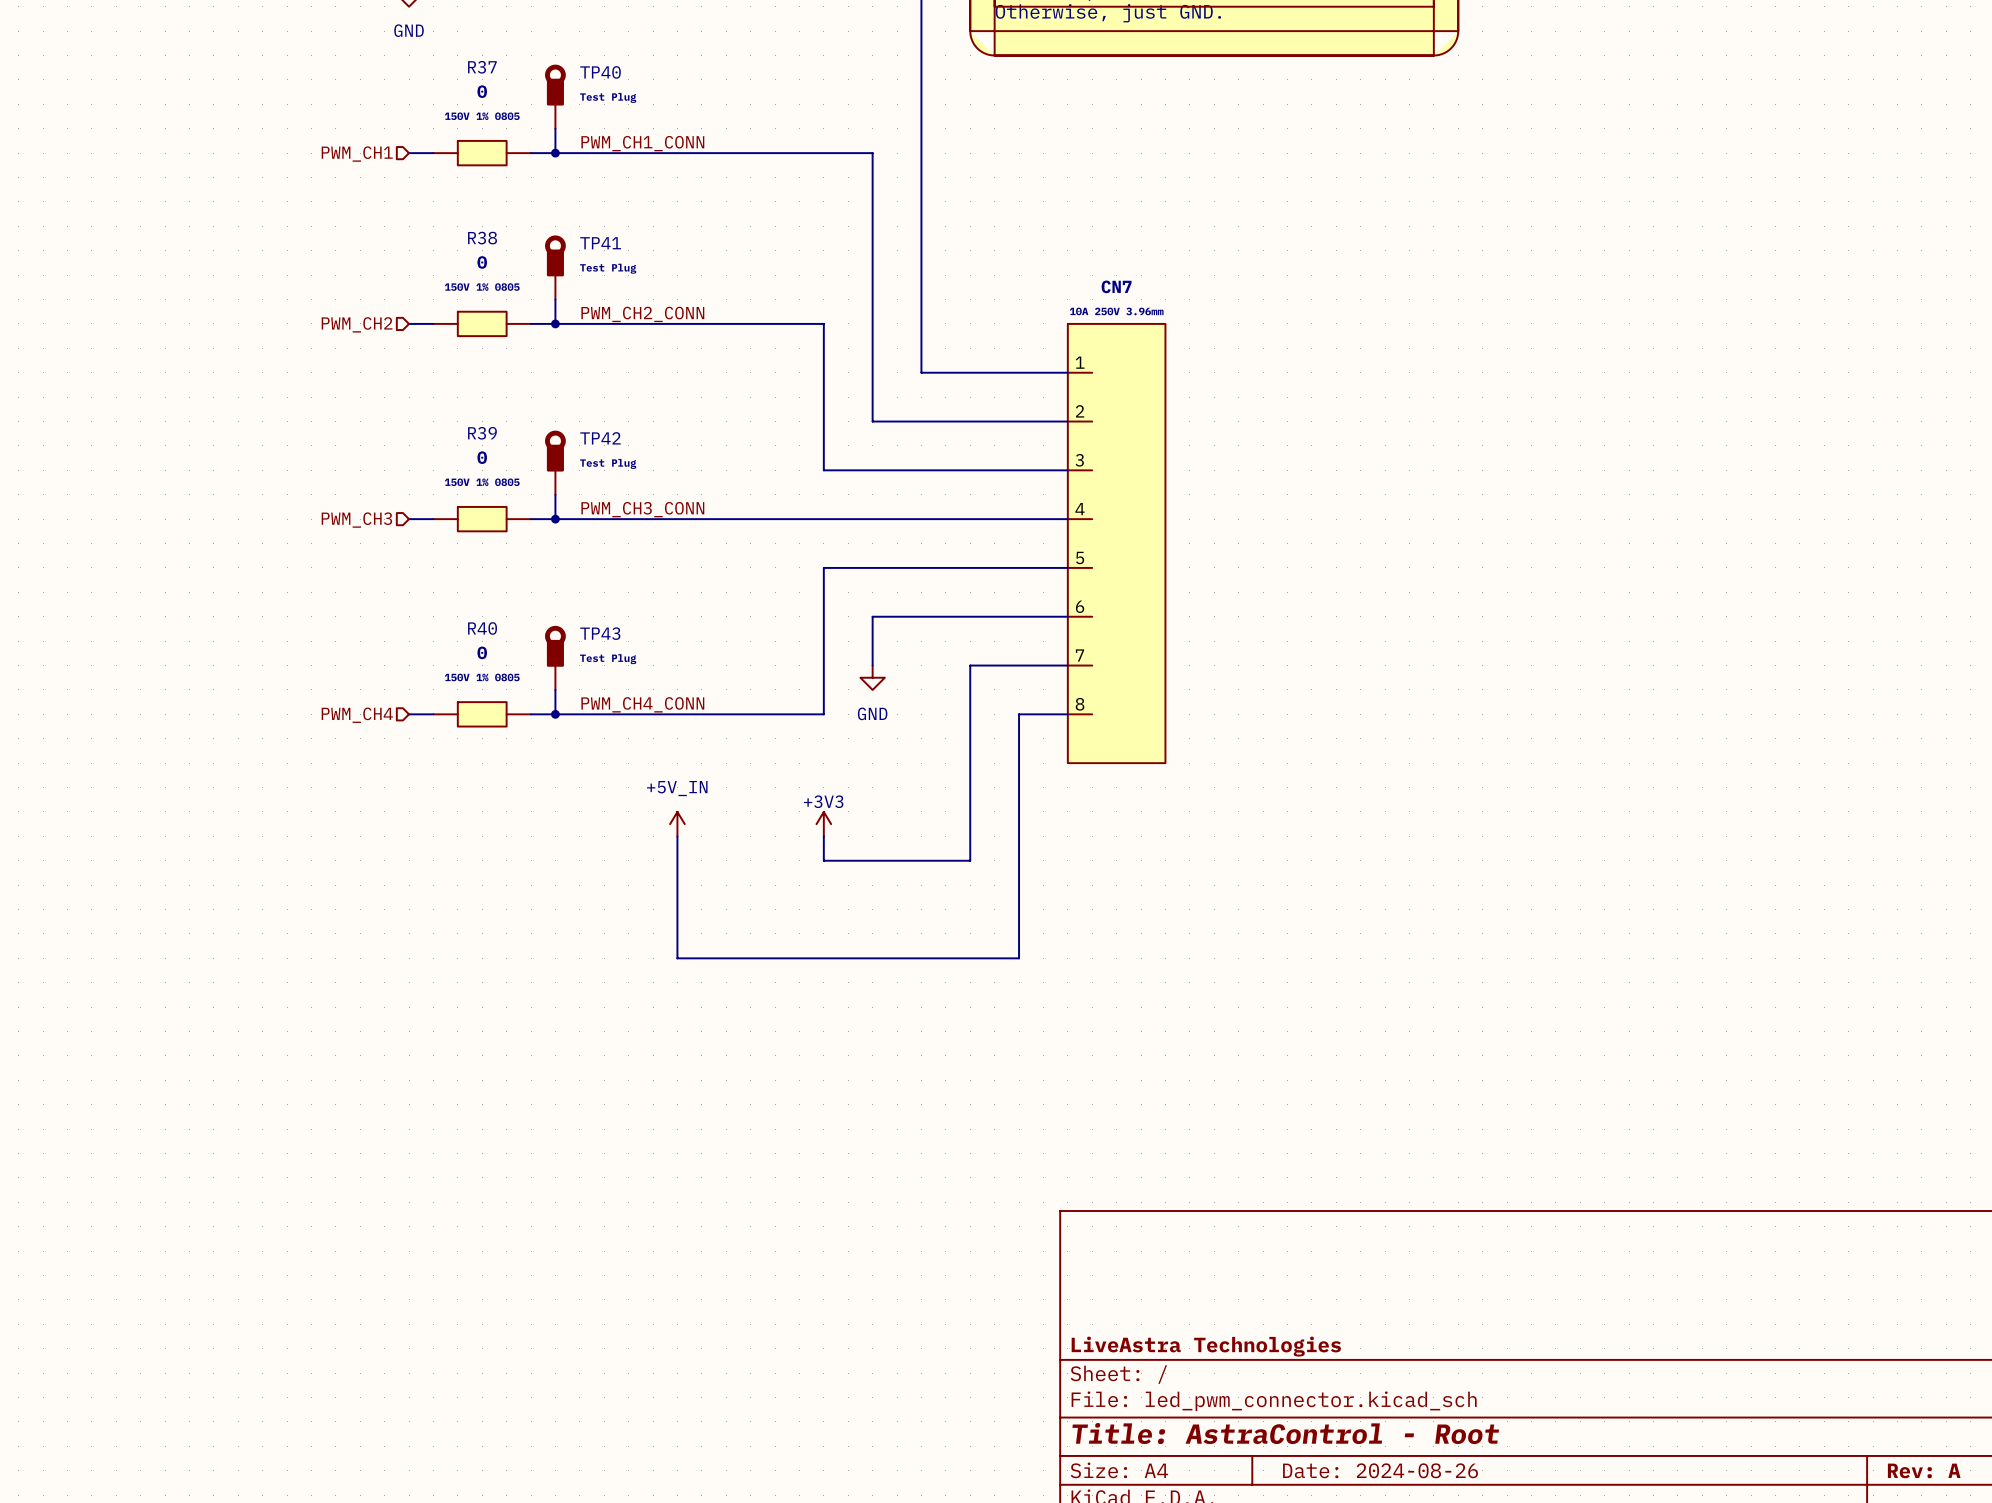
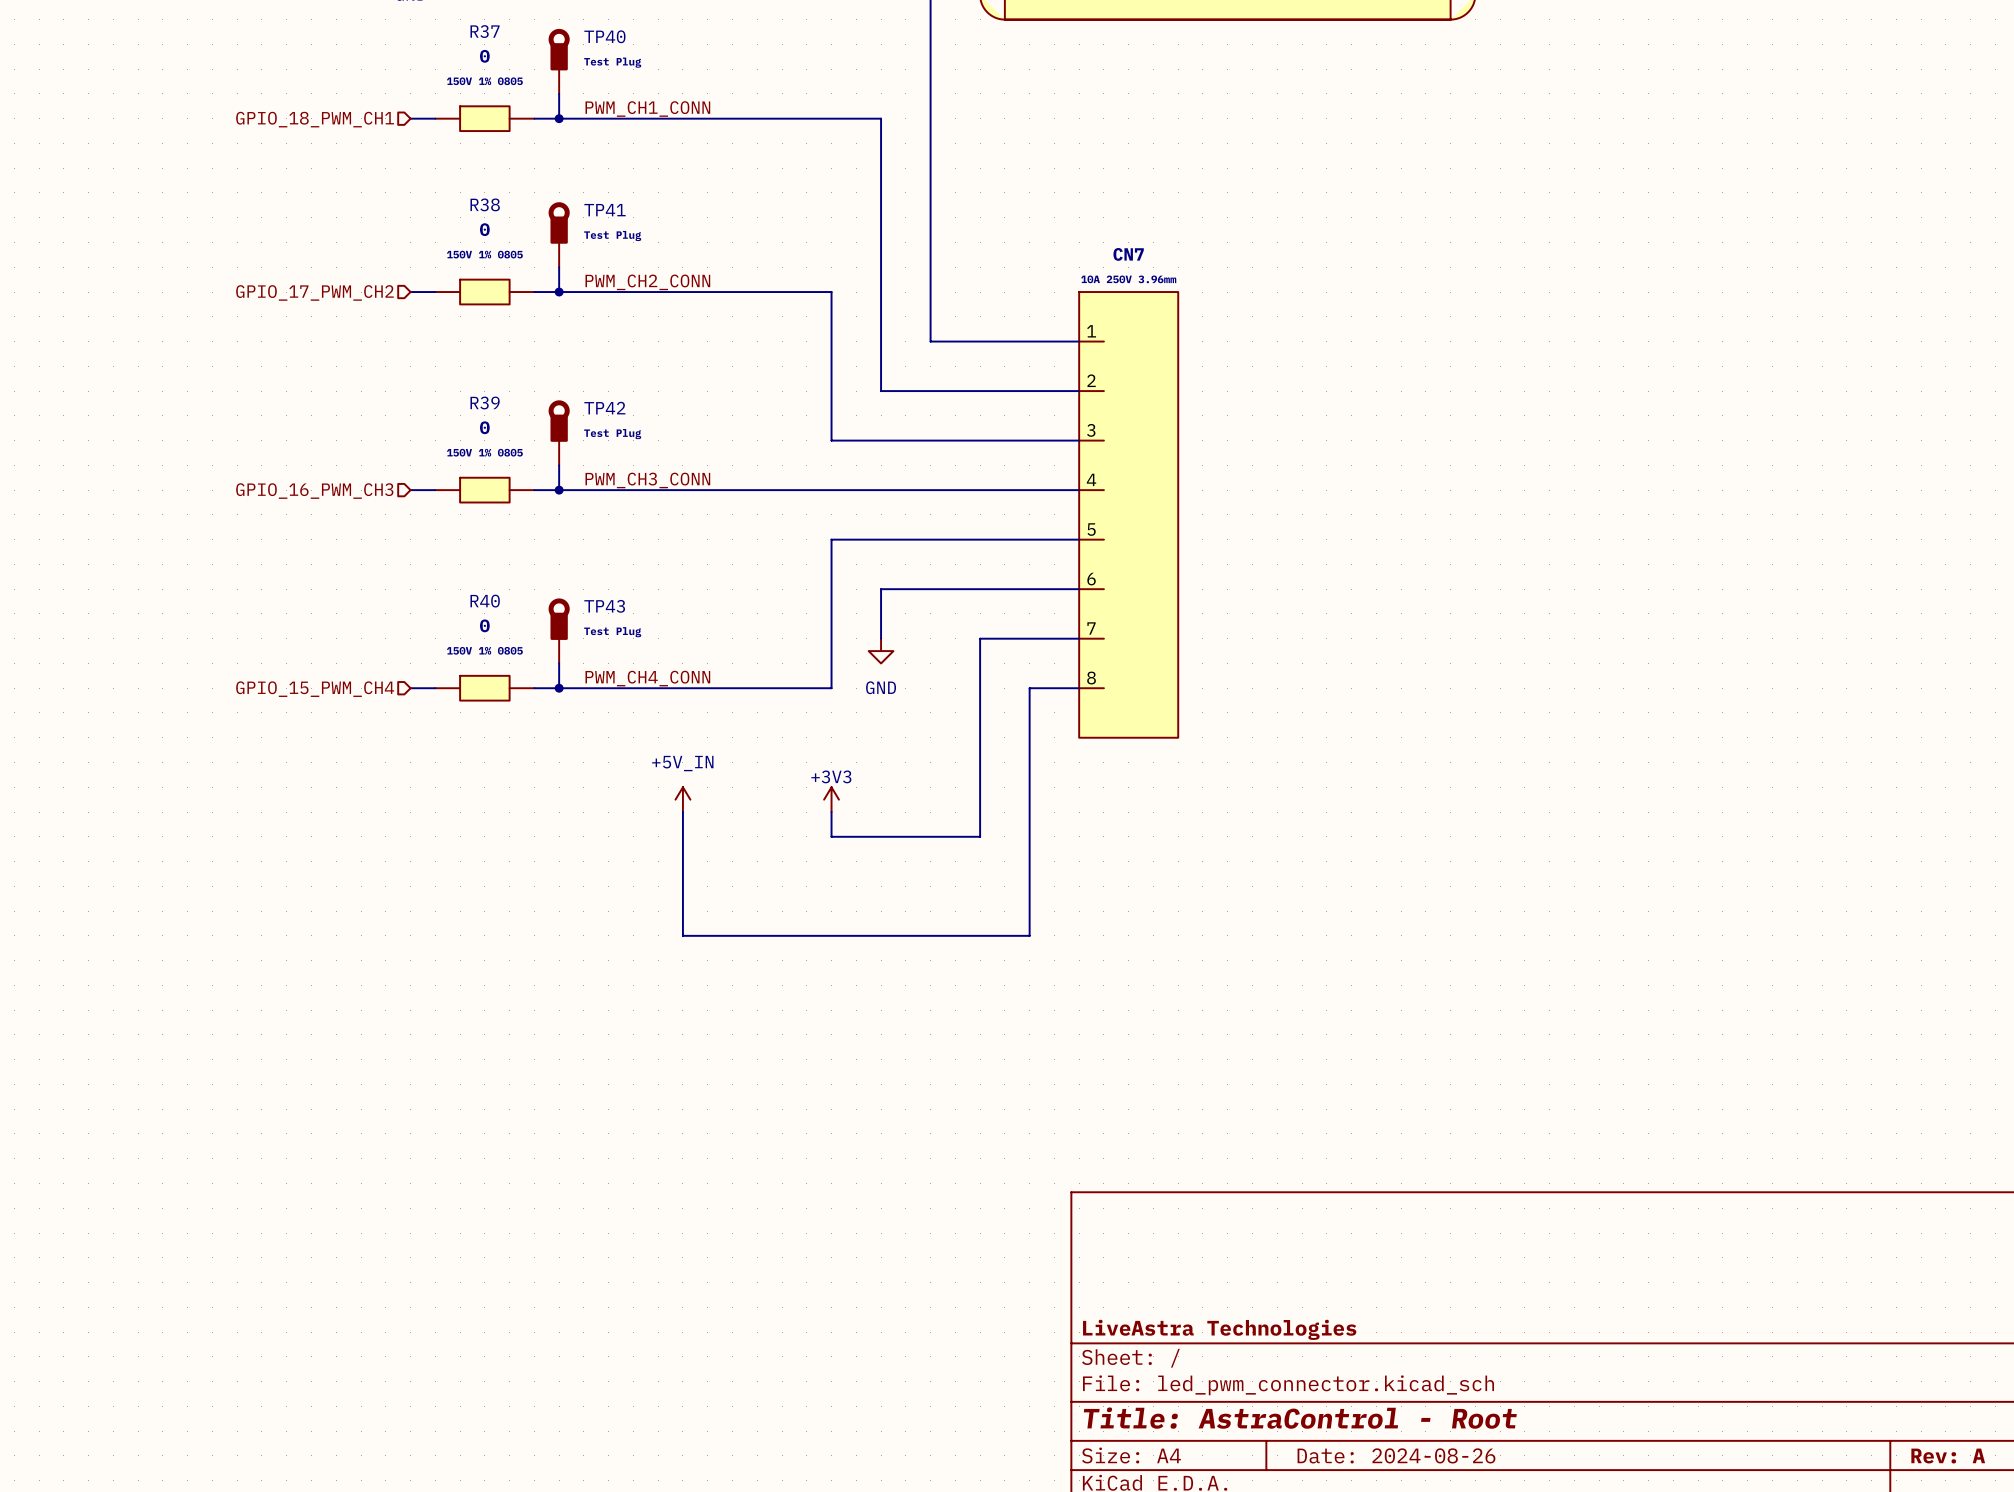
hierarchical label: PWM_CH1 (357, 154) -> GPIO_18_PWM_CH1 (315, 119)
hierarchical label: PWM_CH2 (357, 324) -> GPIO_17_PWM_CH2 (314, 292)
hierarchical label: PWM_CH3 (356, 520) -> GPIO_16_PWM_CH3 (314, 491)
hierarchical label: PWM_CH4 (357, 715) -> GPIO_15_PWM_CH4 (315, 689)

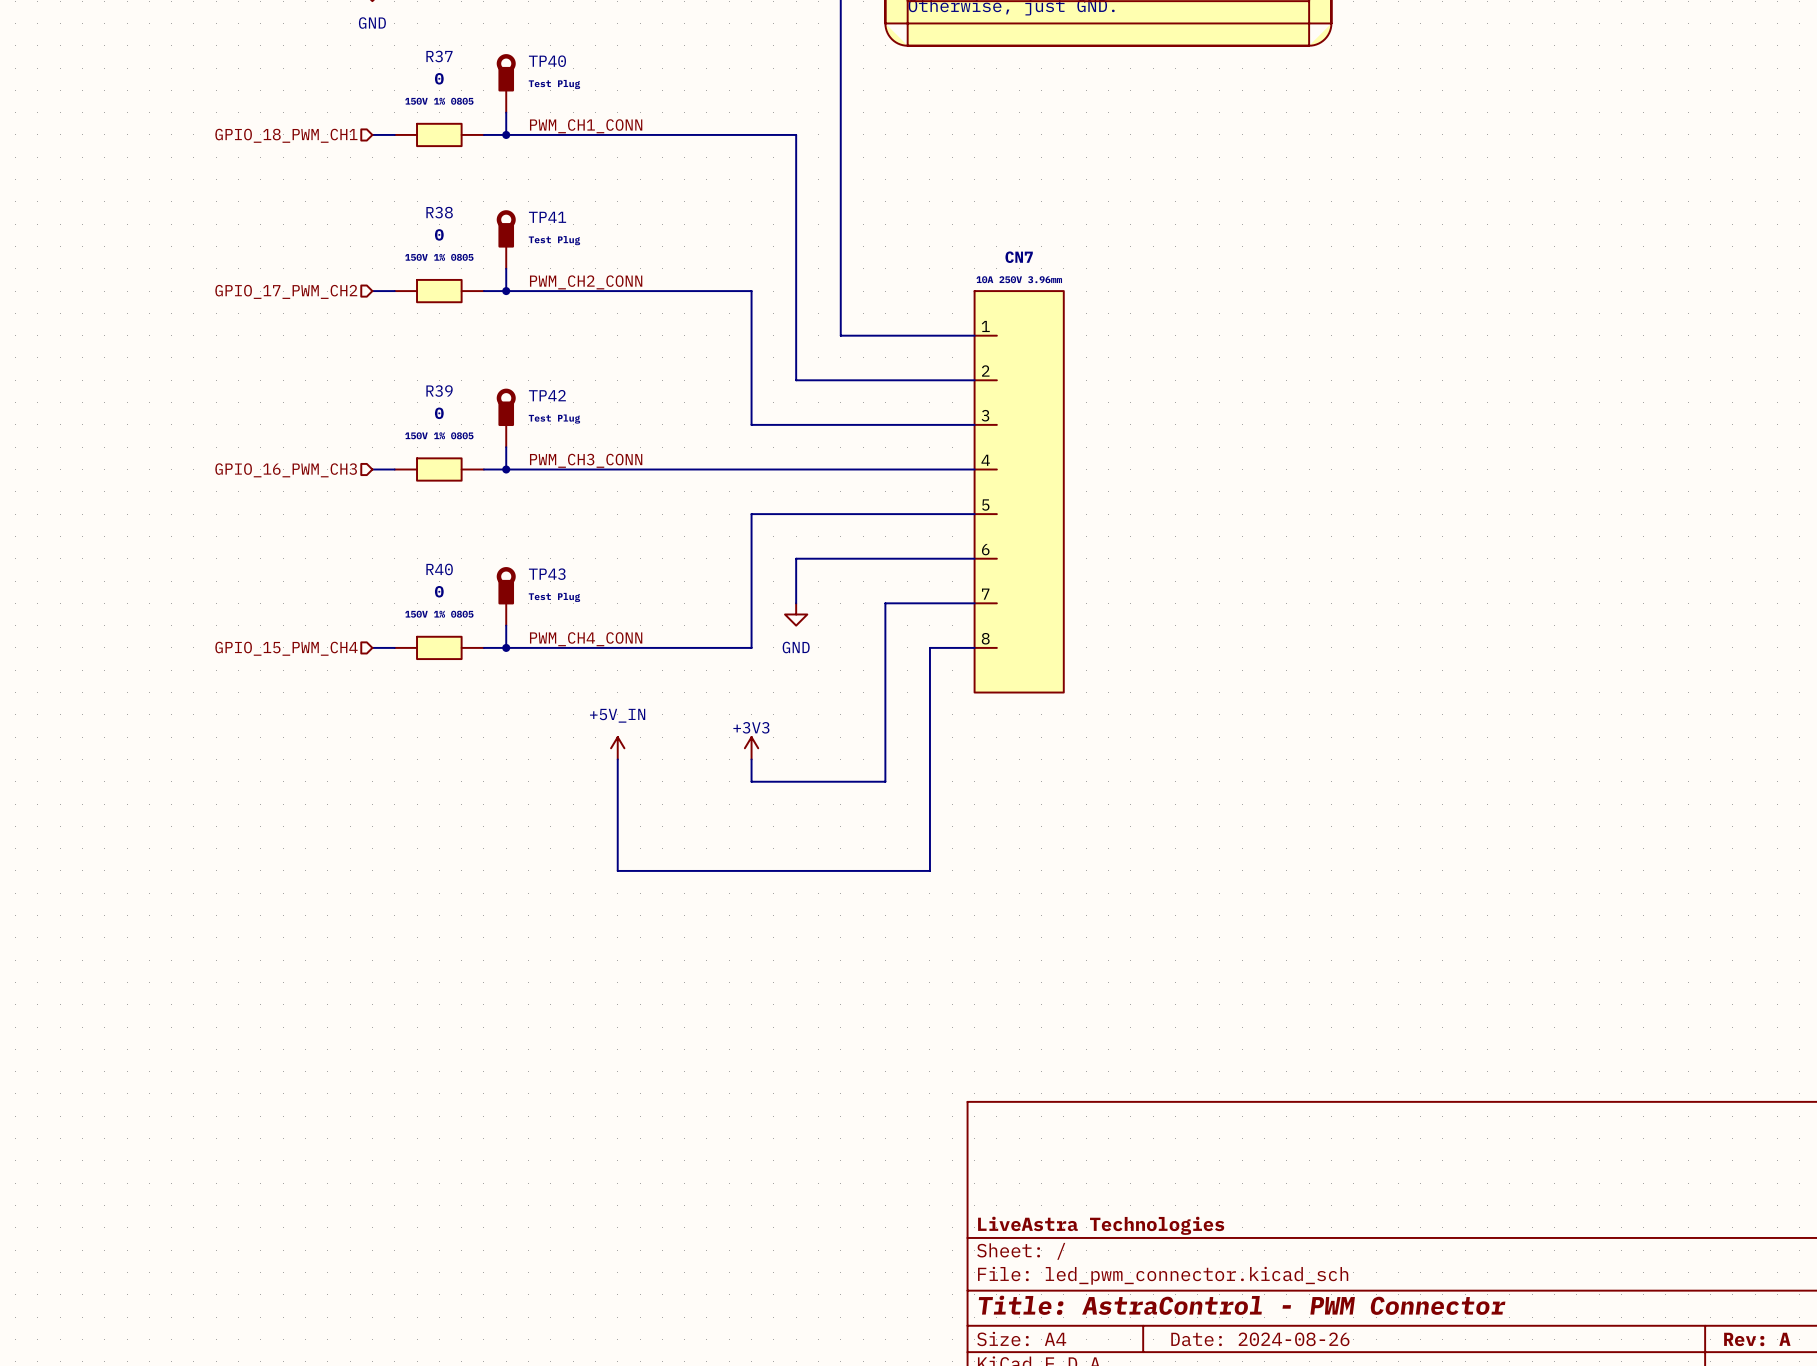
title block: Title: AstraControl - Root (1300, 1418) -> Title: AstraControl - PWM Connector (1242, 1305)

